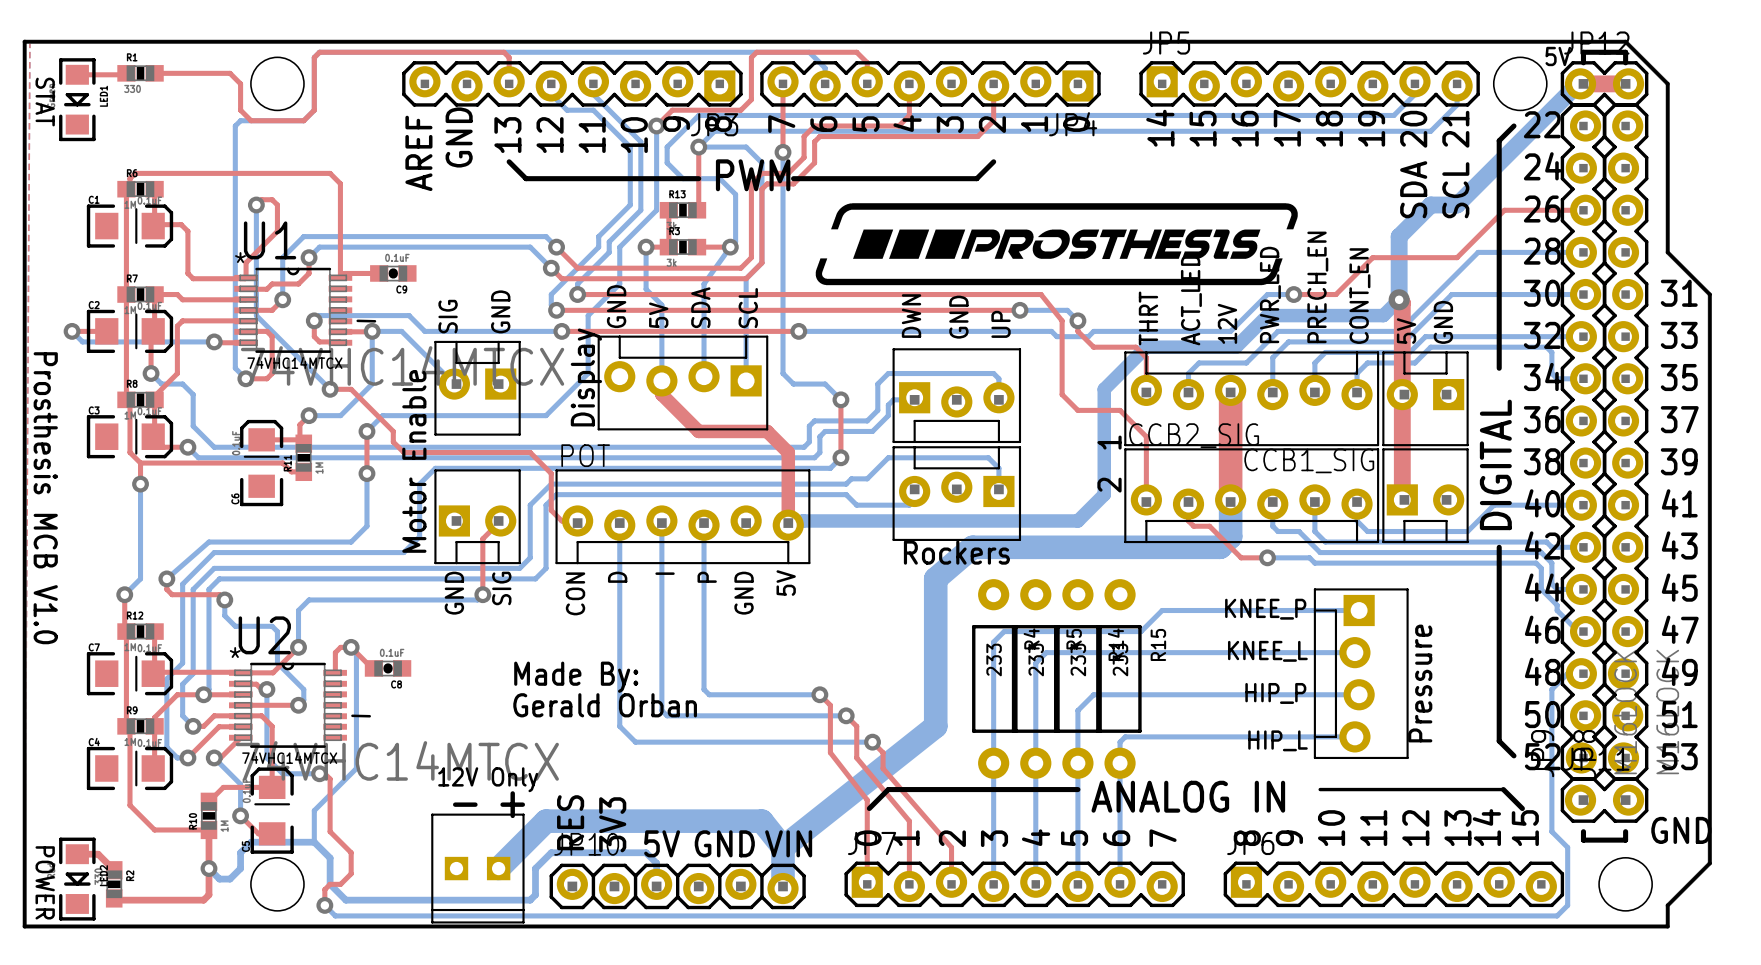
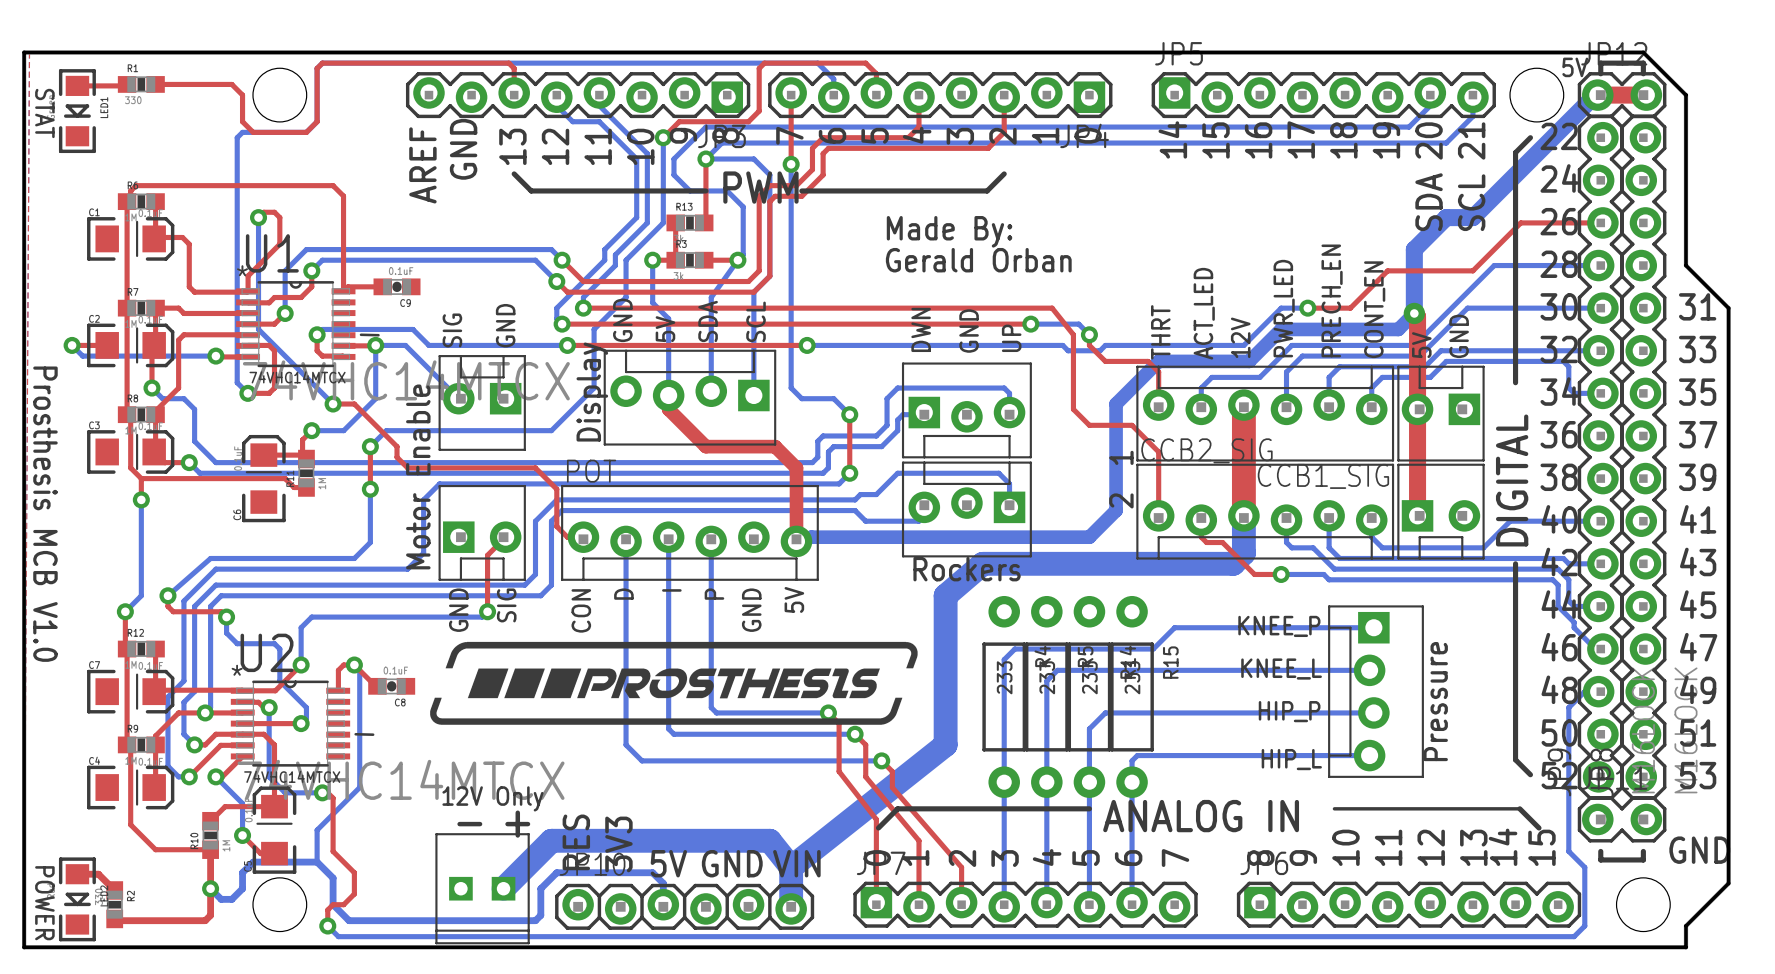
drawing: [815, 203, 1298, 286] -> none
text: none -> Made By: (949, 231)
text: none -> Gerald Orban (978, 260)
drawing: none -> [430, 641, 918, 725]
text: Made By: (576, 677) -> none
text: Gerald Orban (605, 705) -> none

